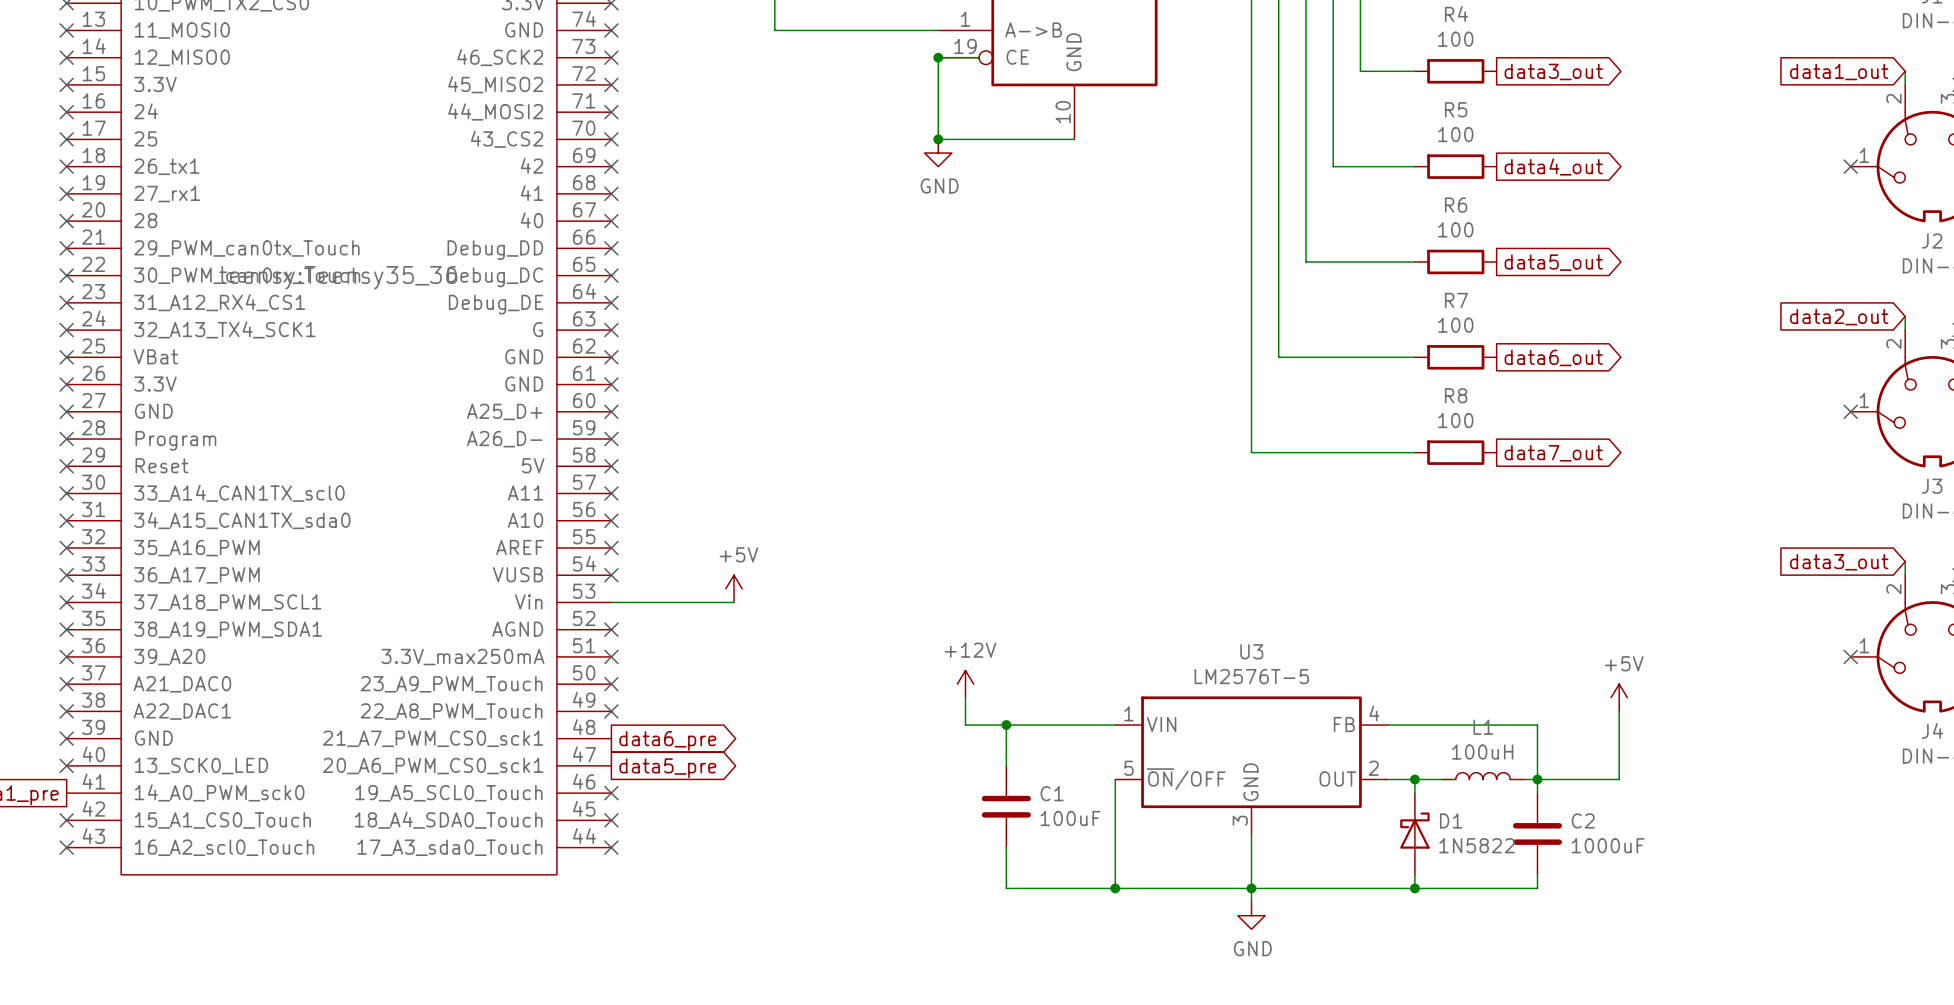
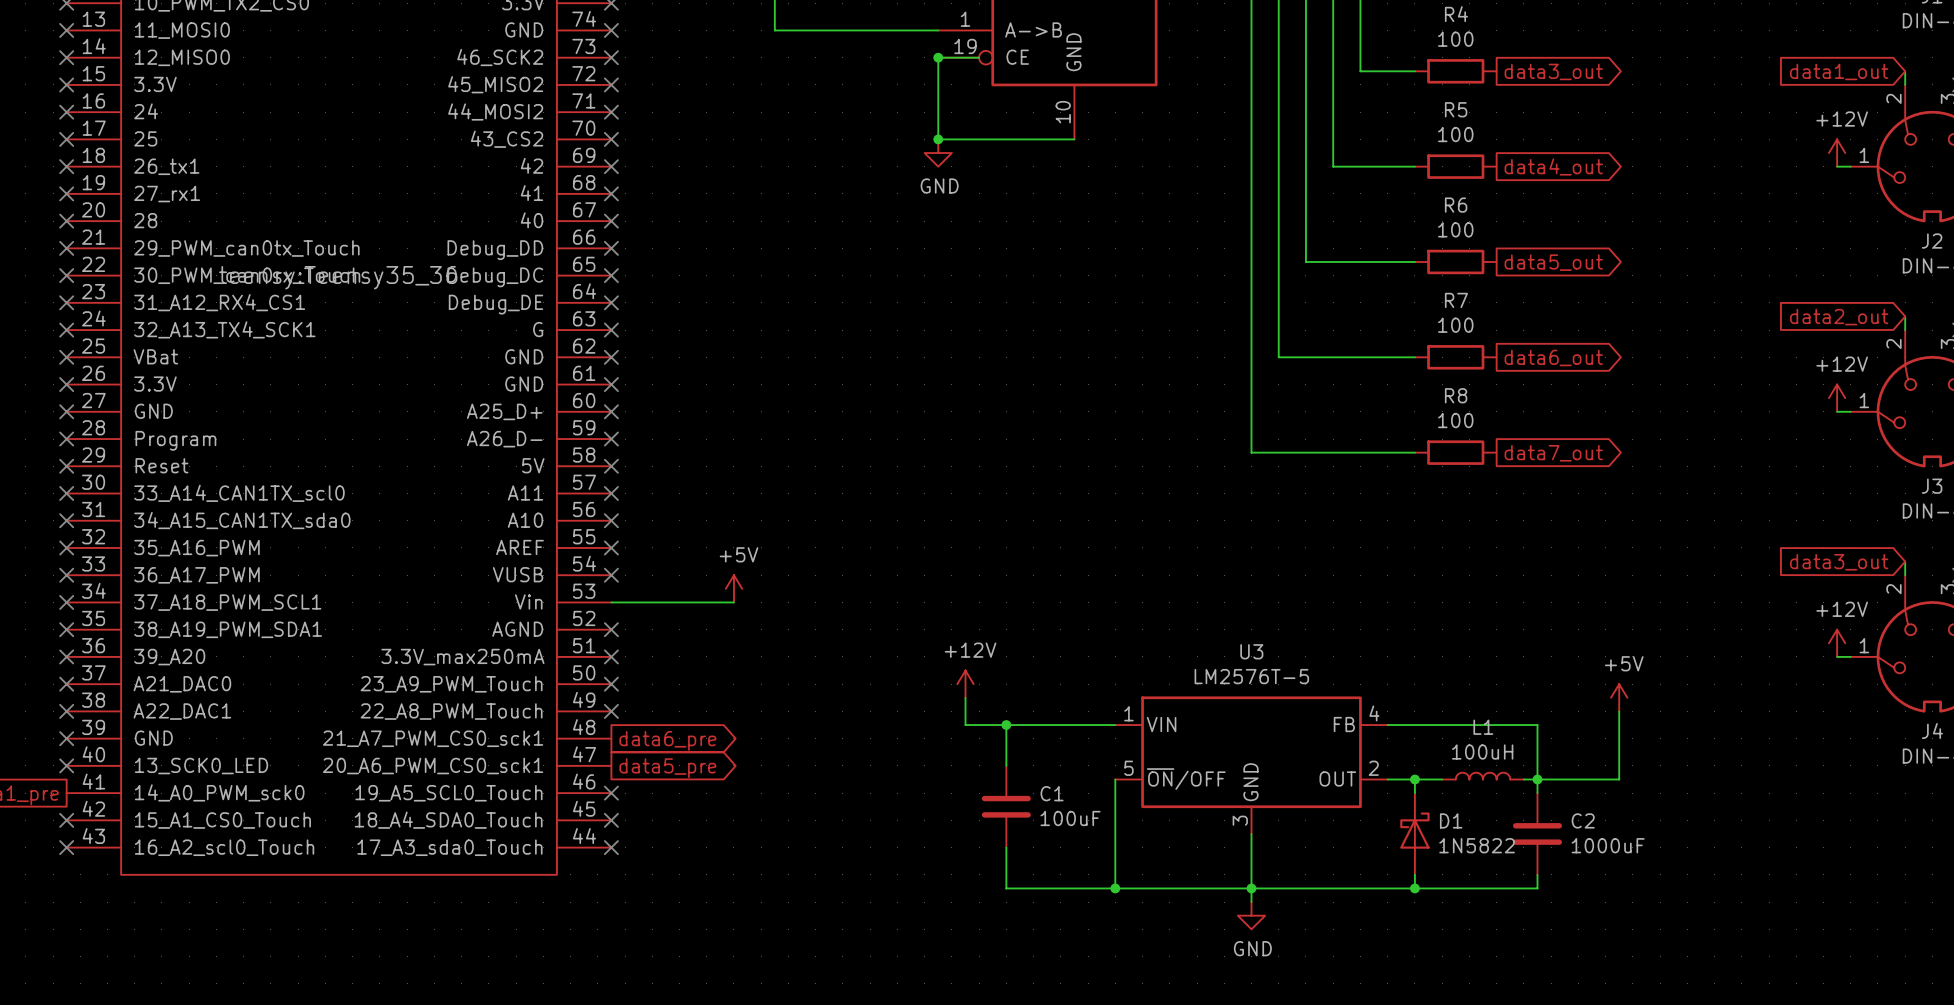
power symbol: none -> +12V (1837, 153)
wire: none -> (1837, 166) (1850, 166)
no-connect mark: (1850, 166) -> none
power symbol: none -> +12V (1837, 398)
wire: none -> (1837, 411) (1850, 411)
no-connect mark: (1850, 411) -> none
power symbol: none -> +12V (1837, 643)
wire: none -> (1837, 656) (1850, 656)
no-connect mark: (1850, 656) -> none

